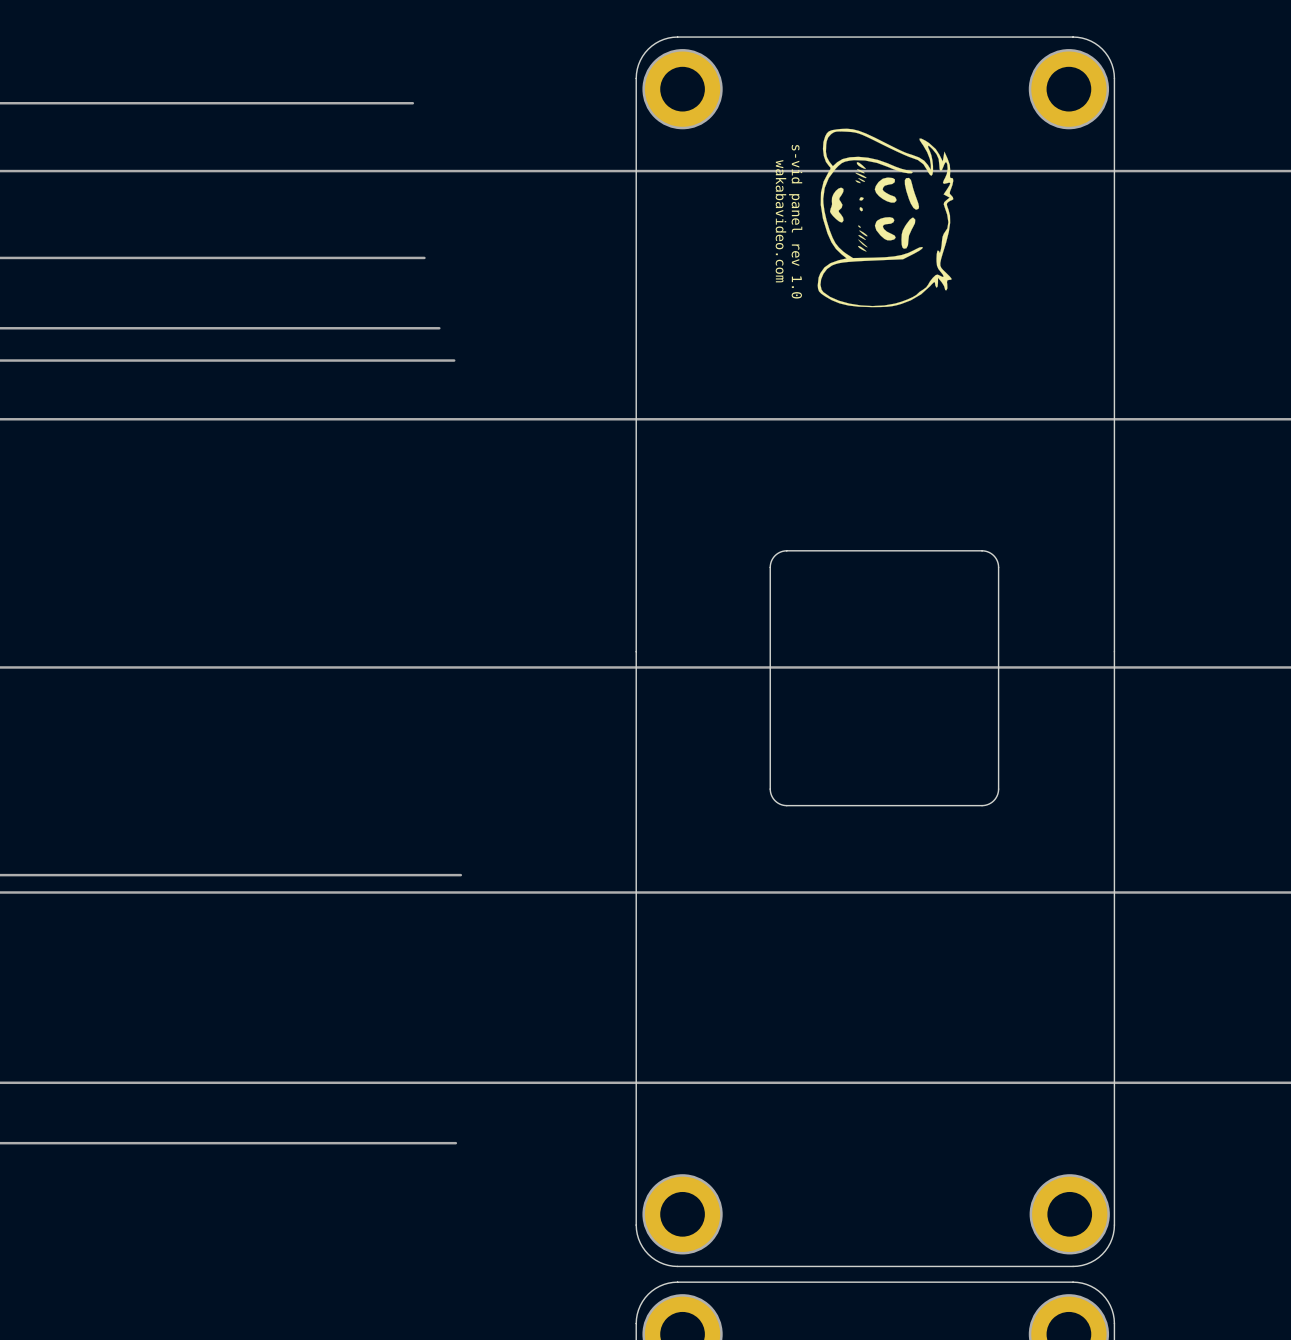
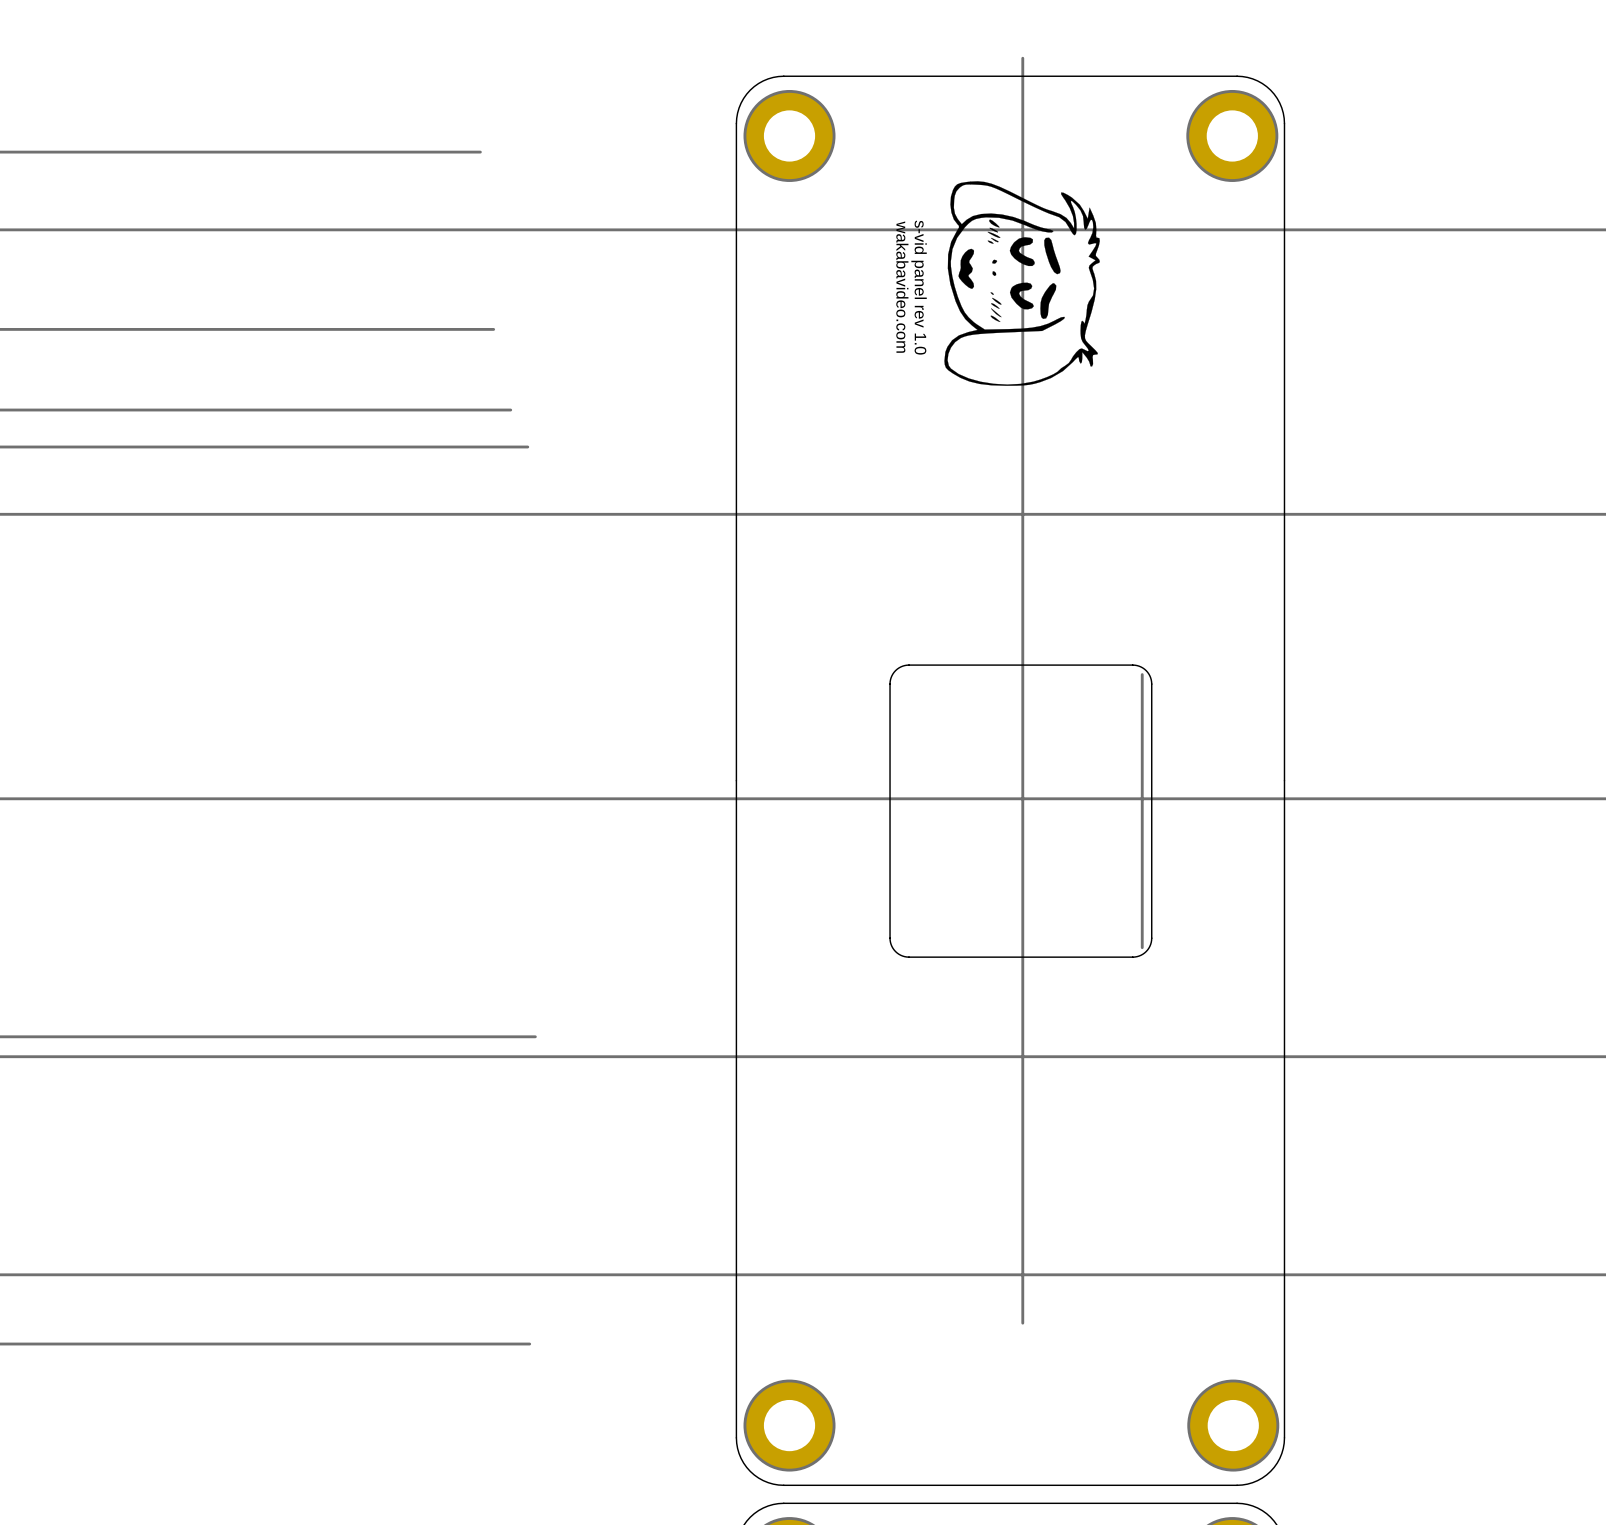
line: none -> (1022, 58) (1022, 1323)
line: none -> (1142, 674) (1142, 947)

